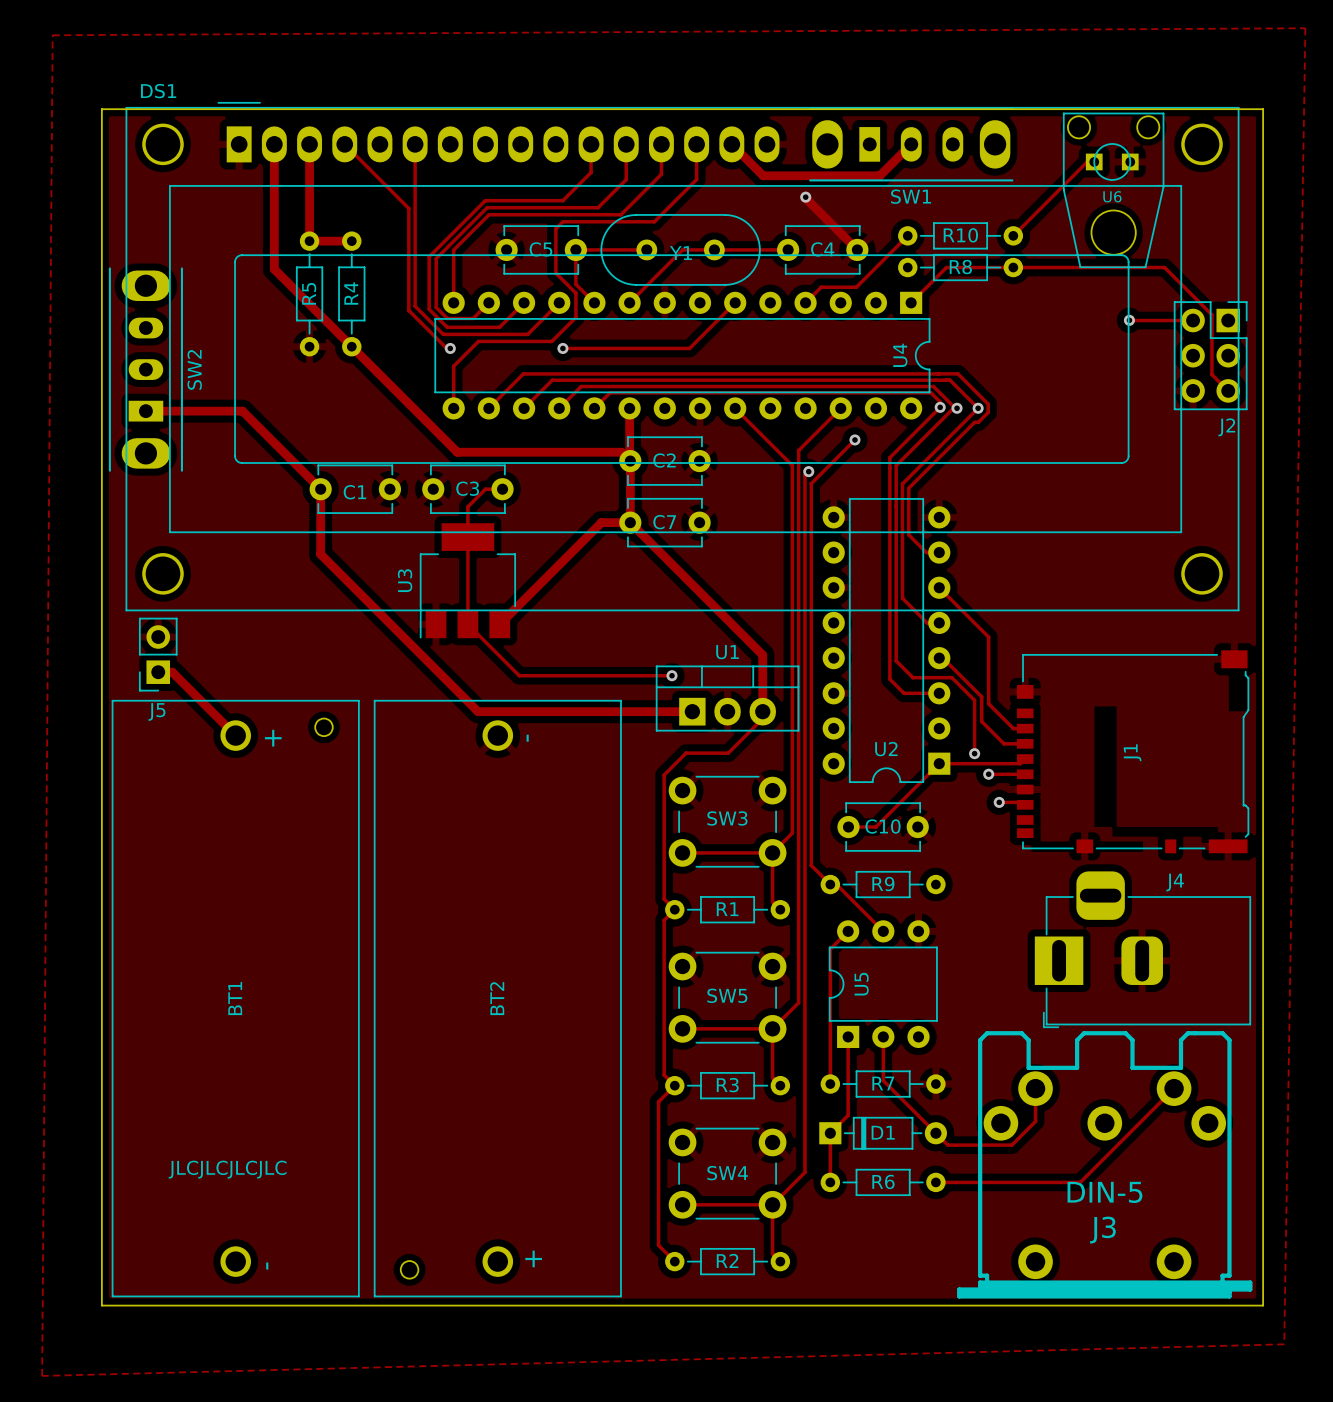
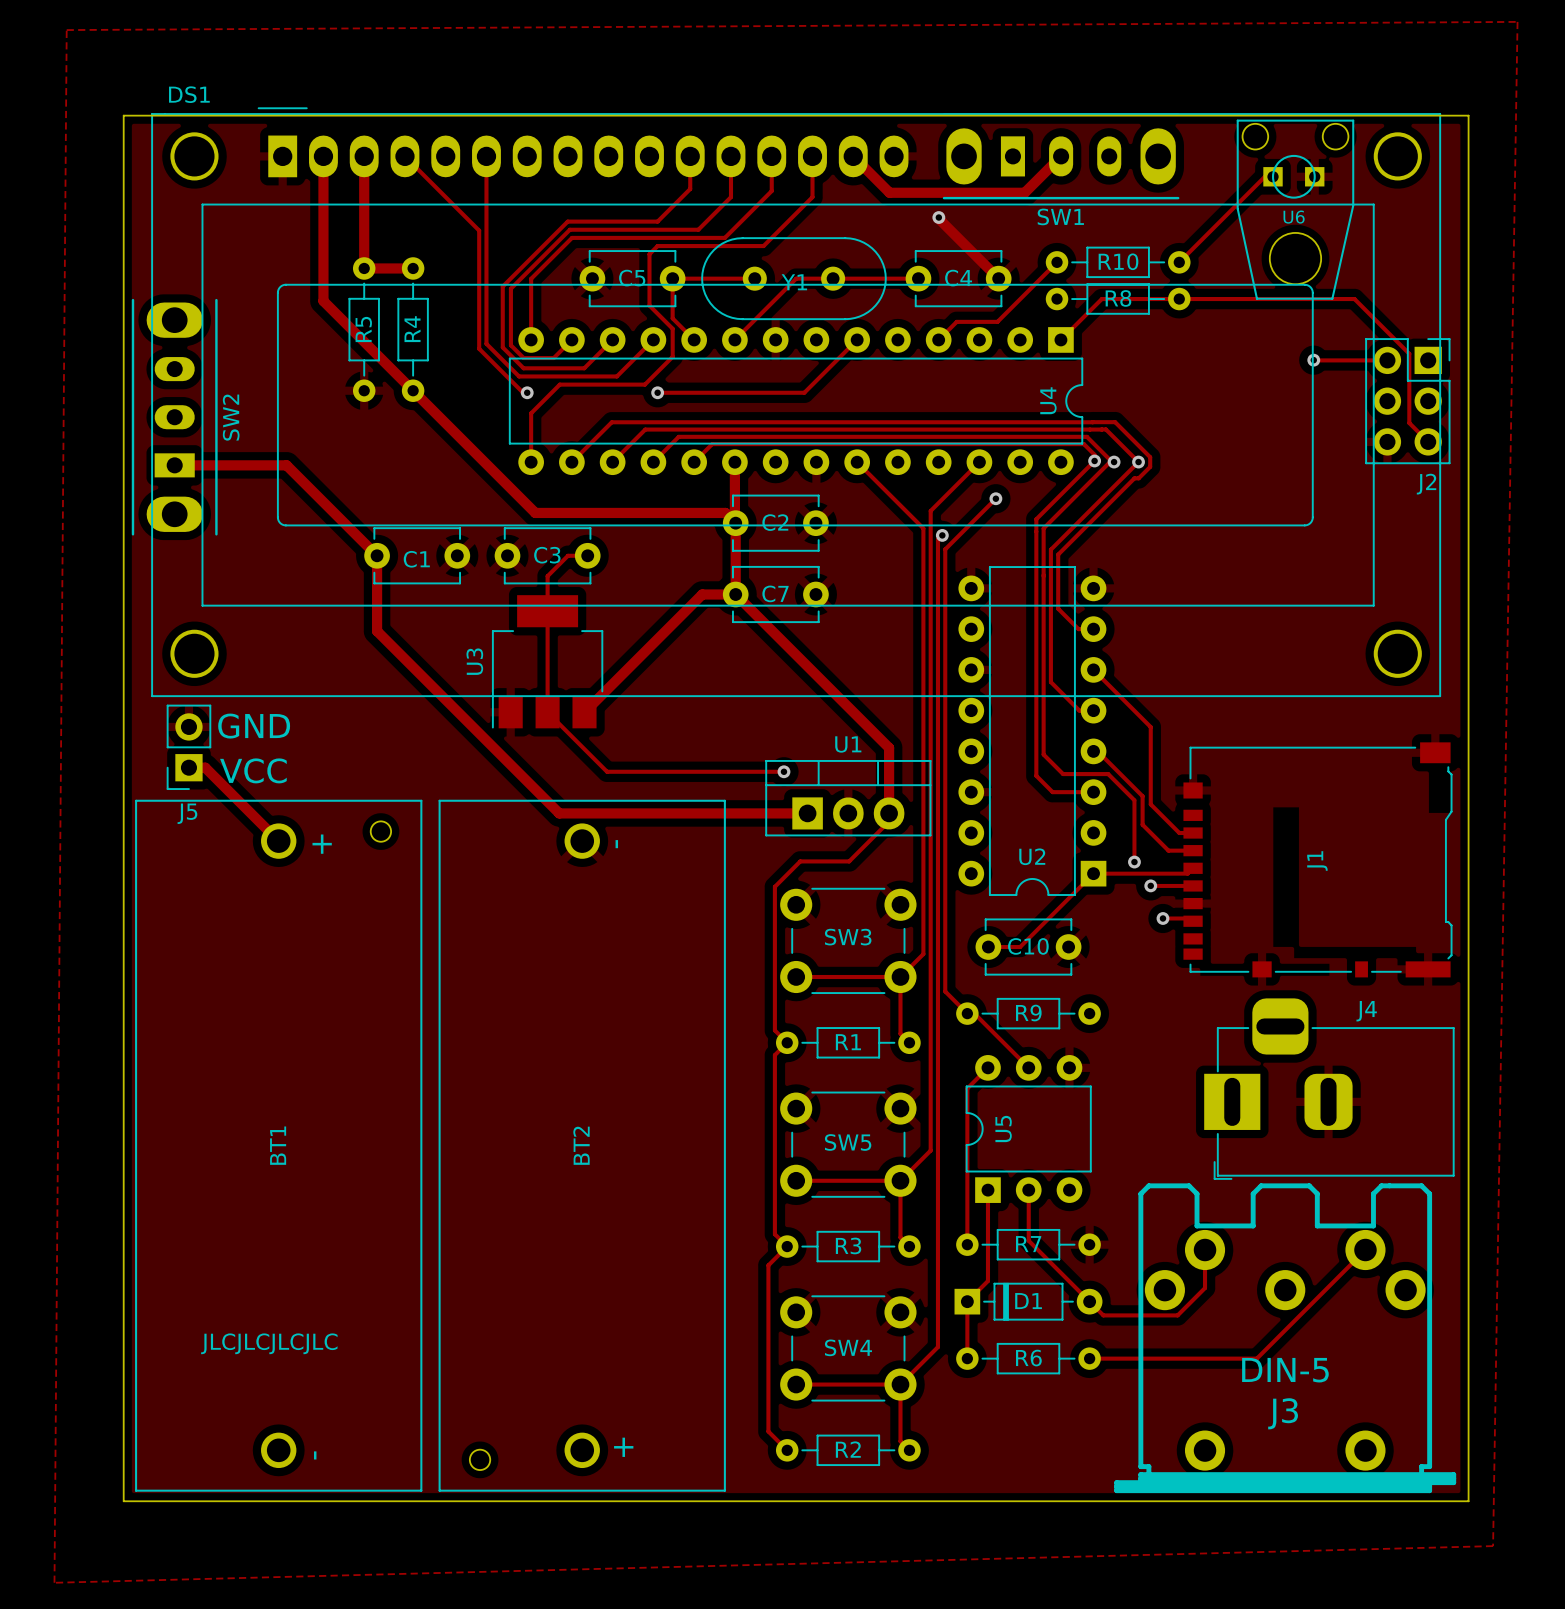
text: none -> GND (254, 726)
text: none -> VCC (253, 770)

